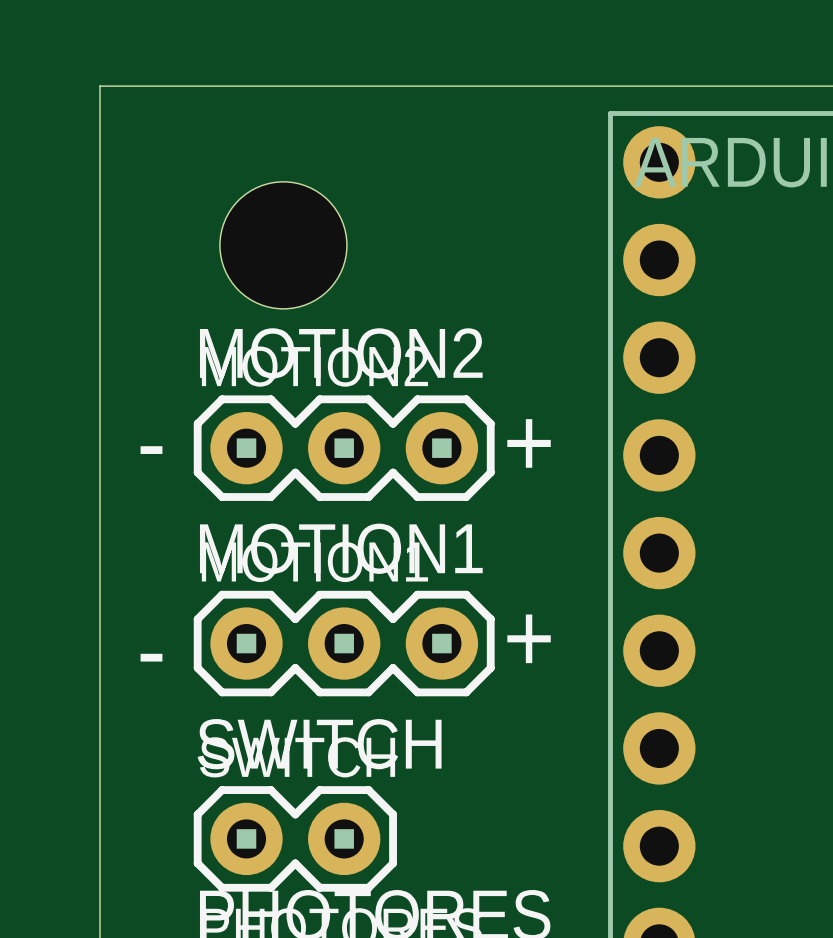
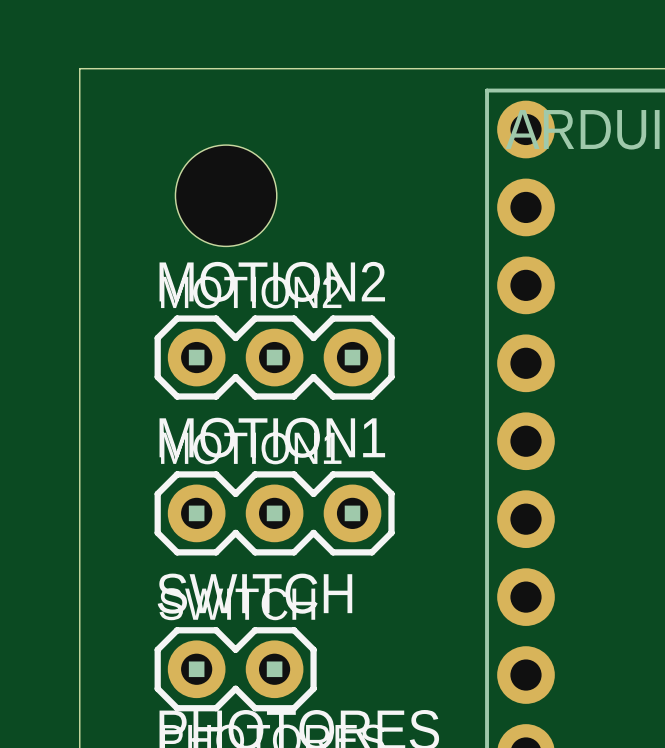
text: + (529, 443) -> none
text: - (151, 450) -> none
text: + (529, 638) -> none
text: - (151, 657) -> none

